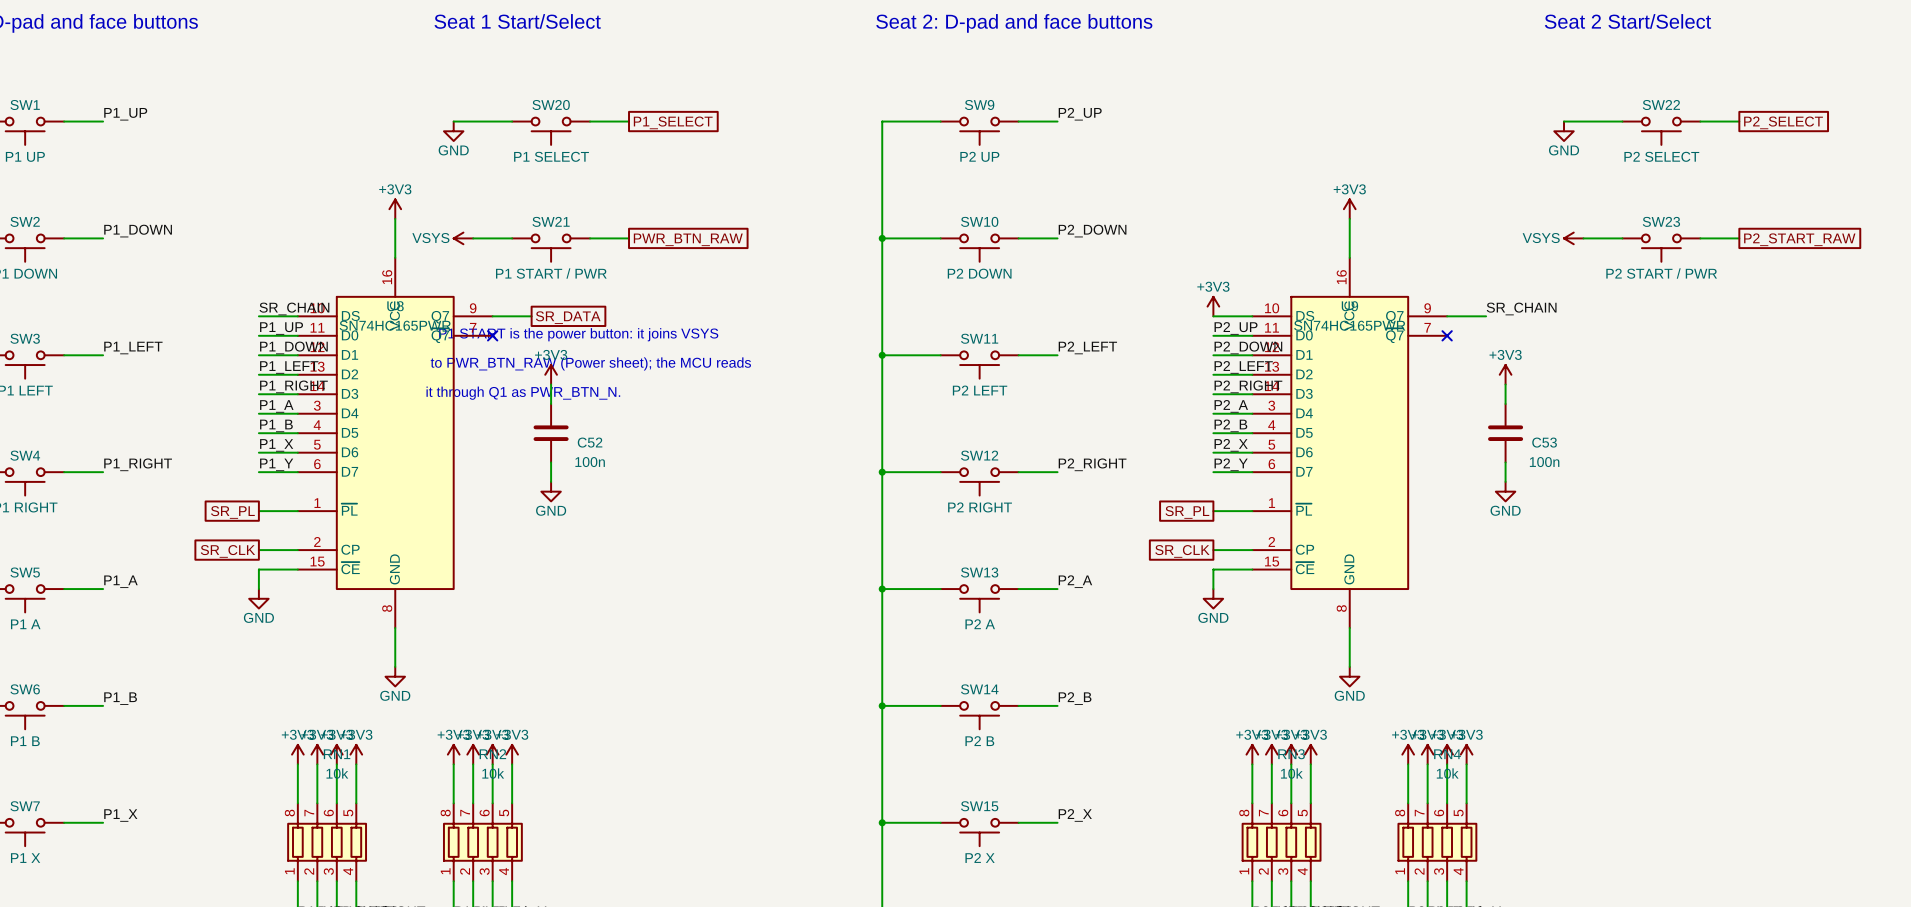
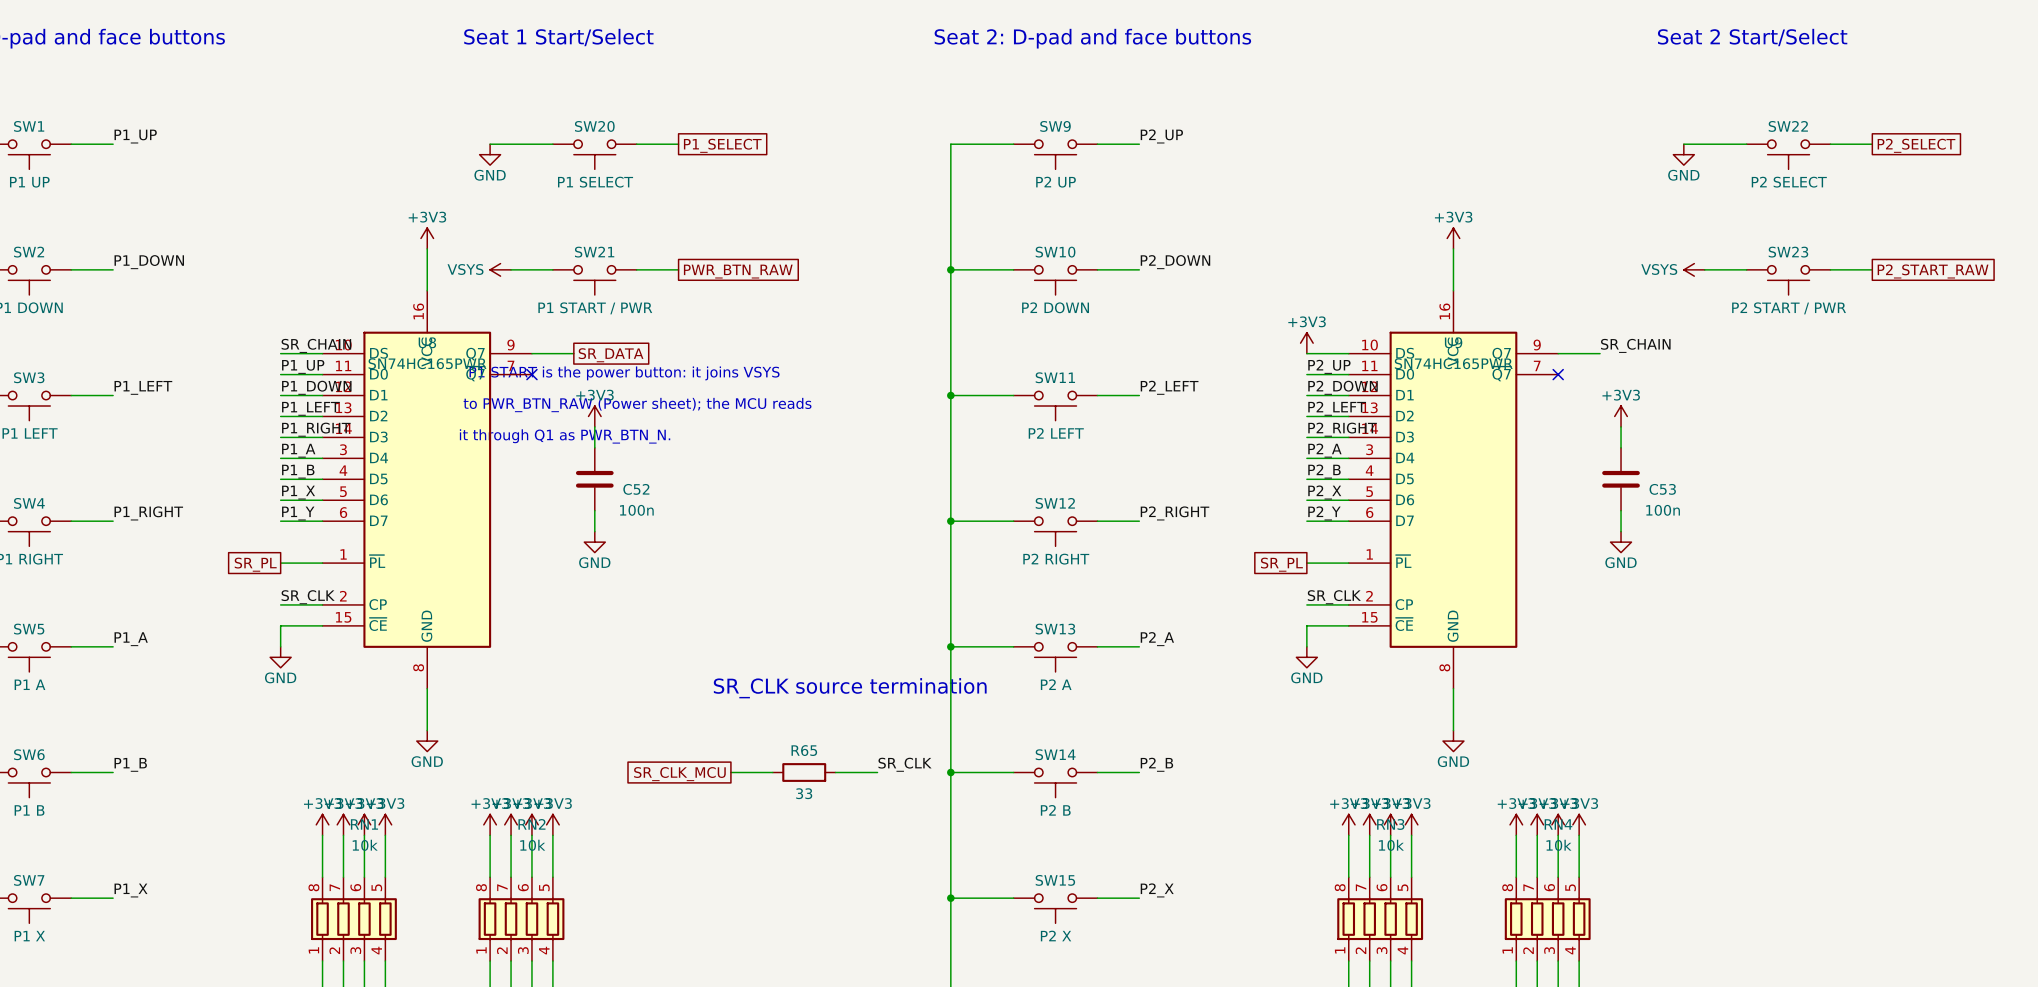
label: none -> SR_CLK (308, 597)
label: none -> SR_CLK (1334, 597)
global label: SR_CLK (227, 551) -> none
global label: SR_CLK (1182, 551) -> none
text: none -> SR_CLK source termination (850, 688)
label: none -> SR_CLK (905, 764)
wire: none -> (730, 772) (772, 772)
R65: none -> 33 (804, 772)
wire: none -> (835, 772) (877, 772)
global label: none -> SR_CLK_MCU (679, 774)

